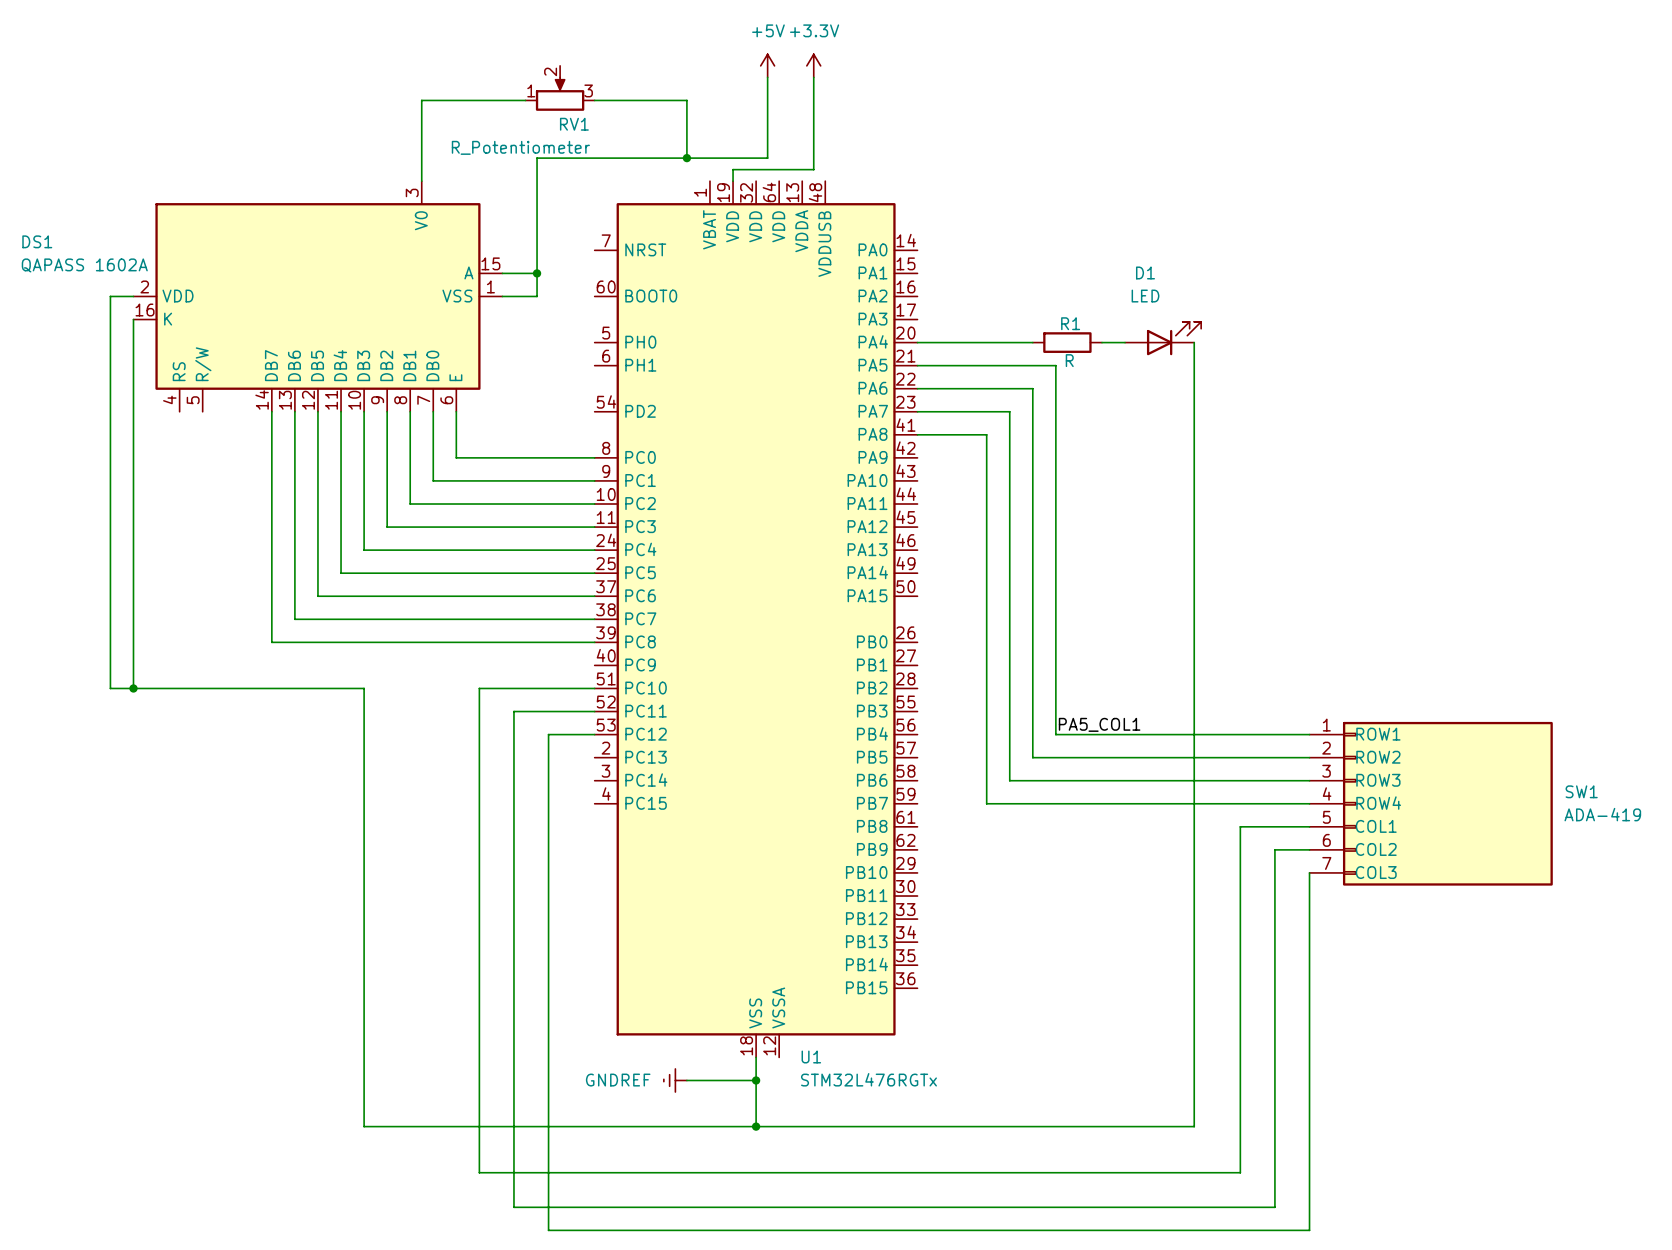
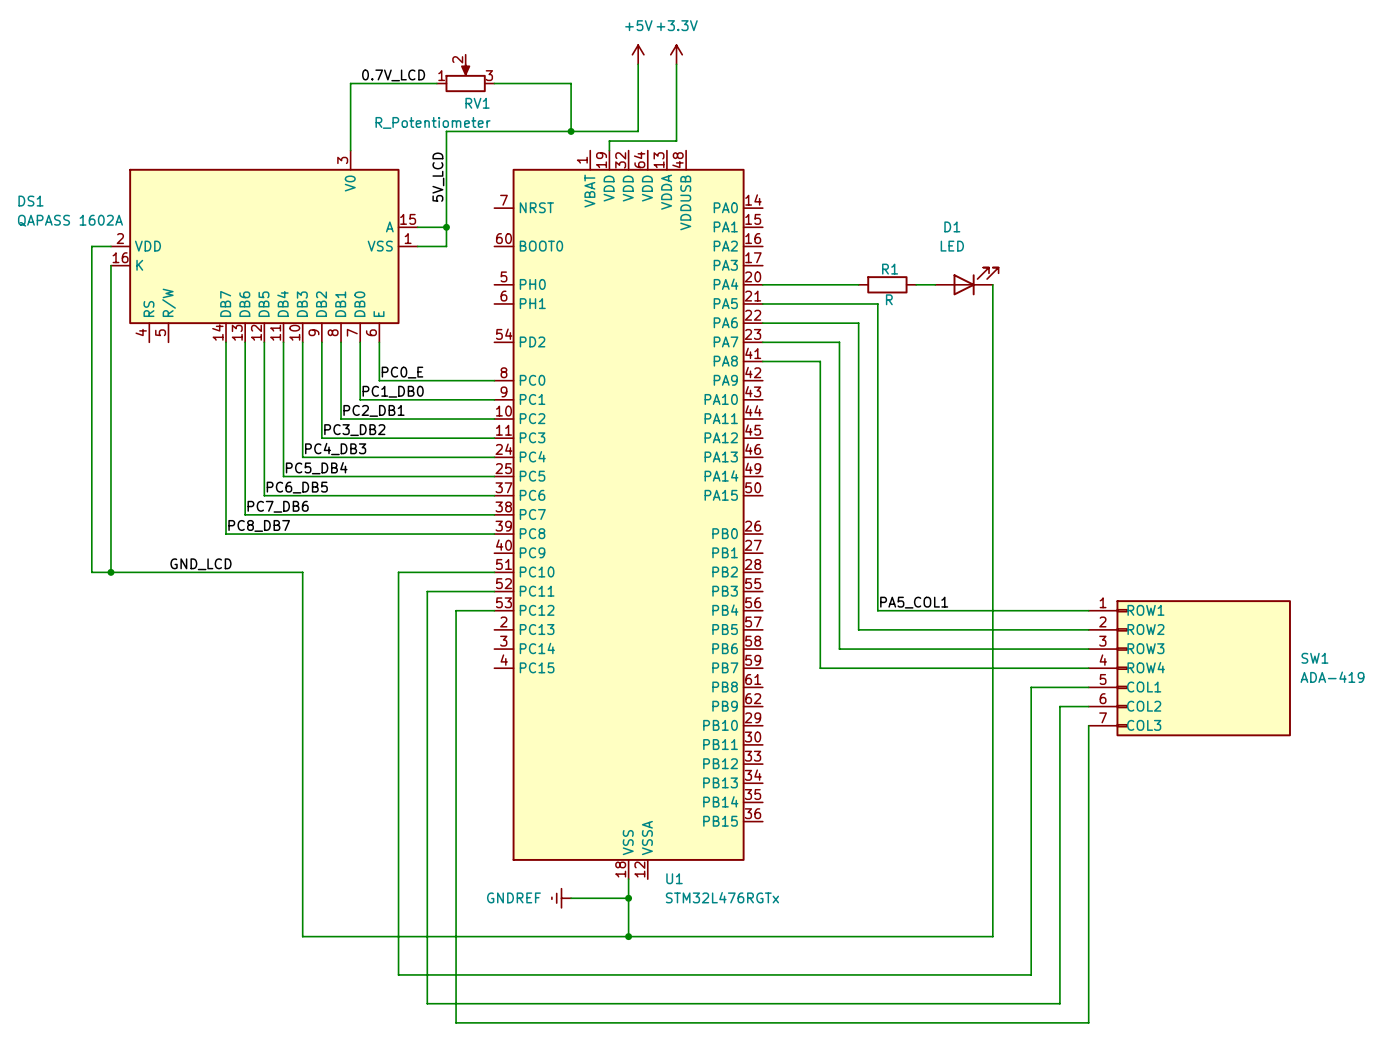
label: none -> 0.7V_LCD (393, 75)
label: none -> 5V_LCD (438, 177)
label: none -> PC0_E (402, 372)
label: none -> PC1_DB0 (393, 391)
label: none -> PC2_DB1 (373, 410)
label: none -> PC3_DB2 (354, 430)
label: none -> PC4_DB3 (335, 449)
label: none -> PC5_DB4 (316, 468)
label: none -> PC6_DB5 (297, 487)
label: none -> PC7_DB6 (278, 506)
label: none -> PC8_DB7 (259, 525)
label: none -> GND_LCD (200, 564)

